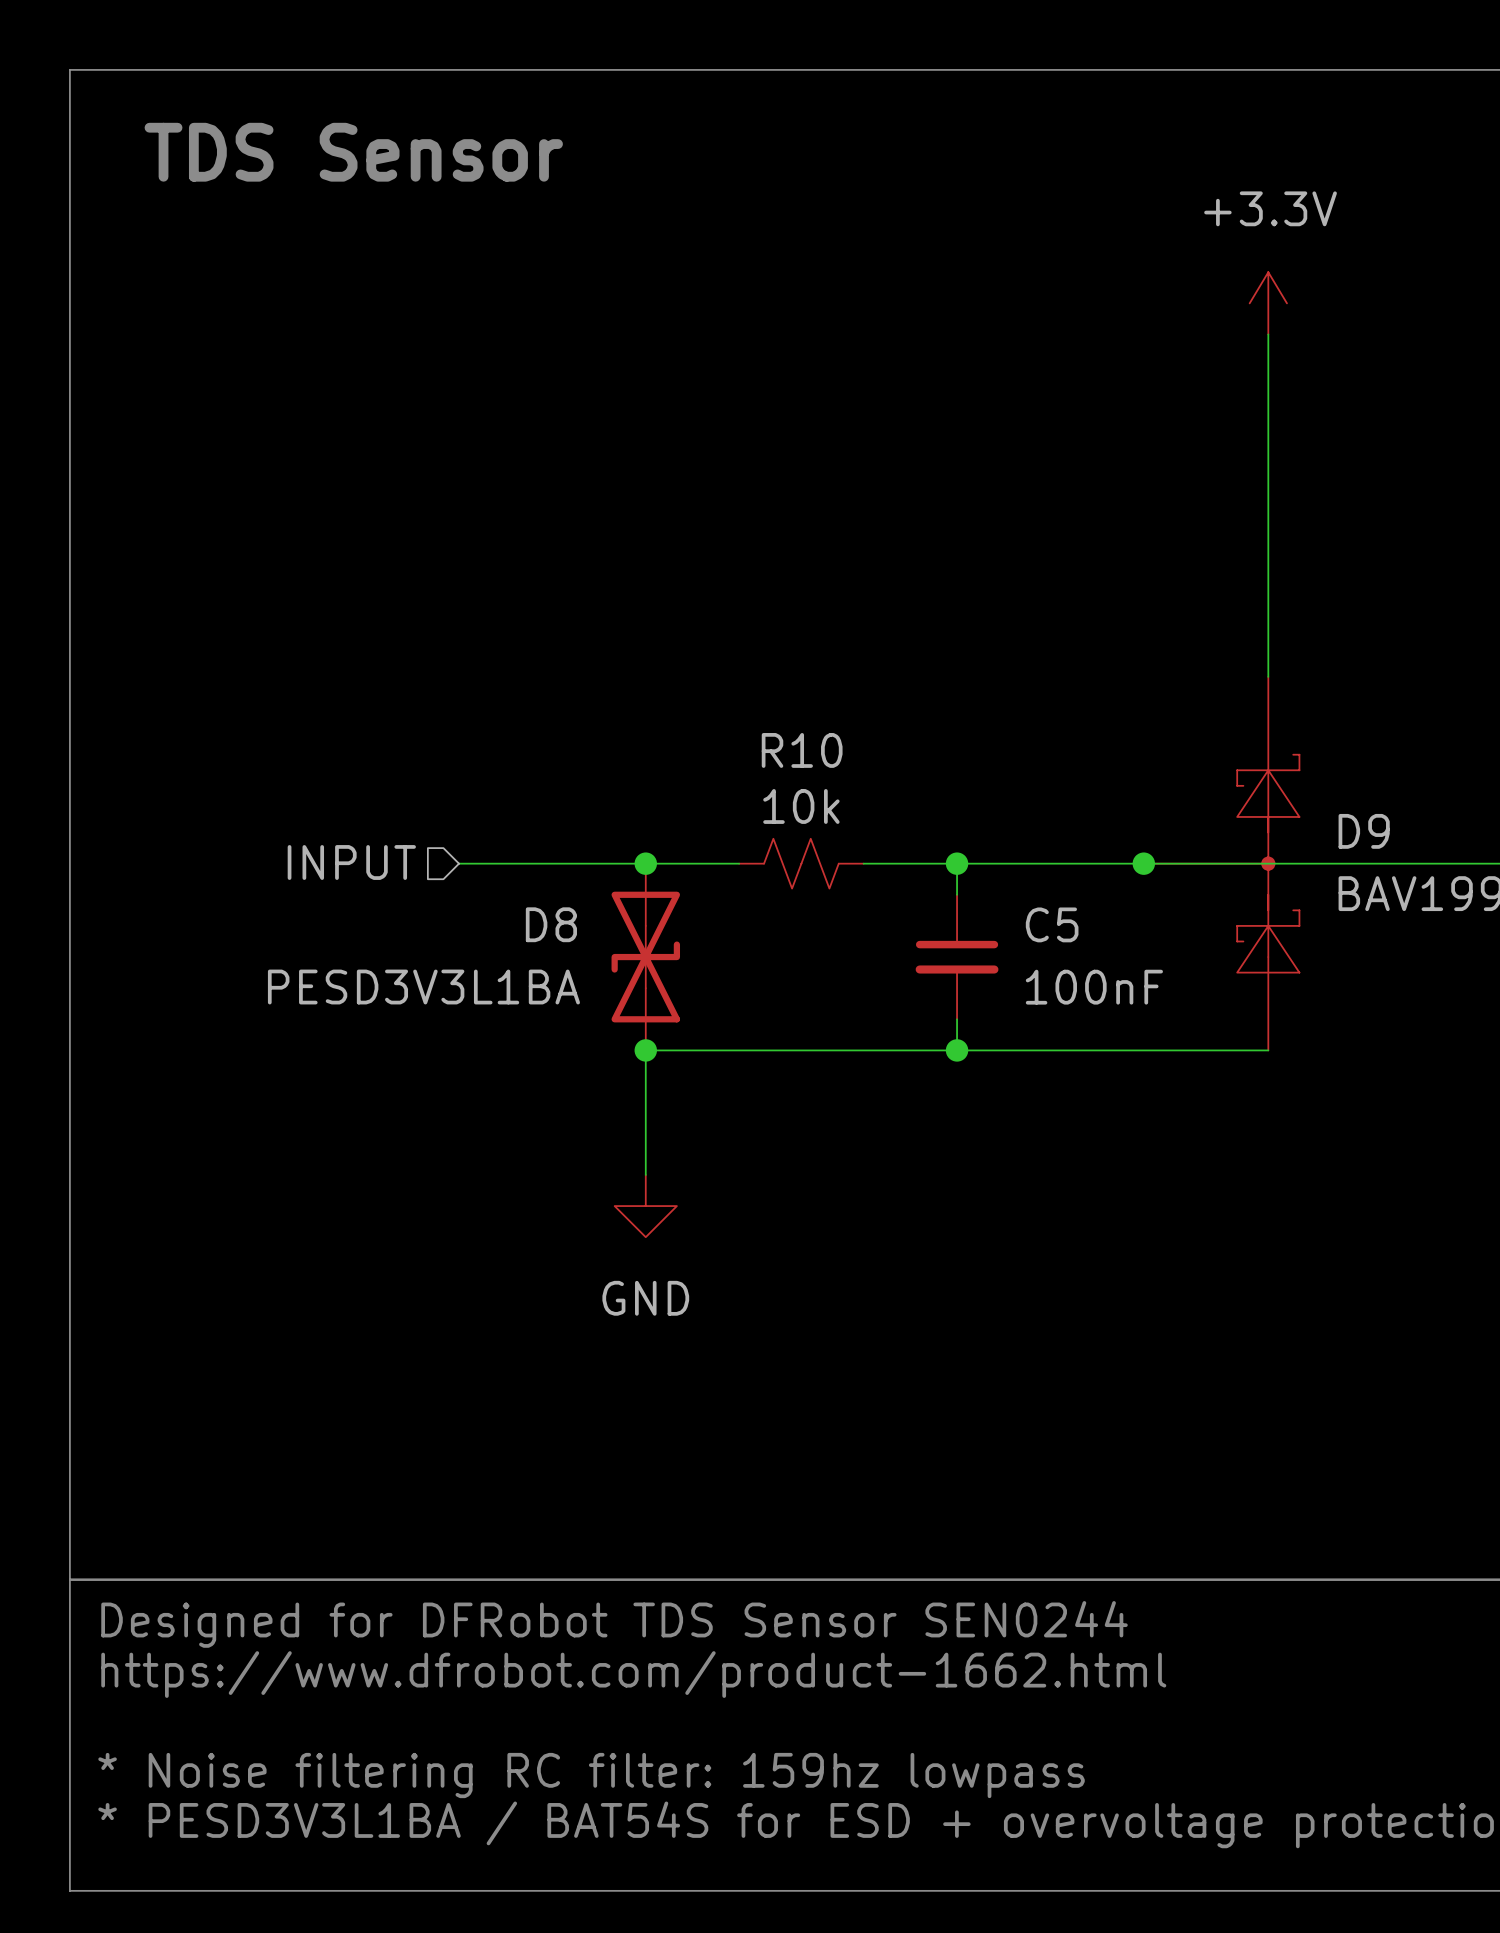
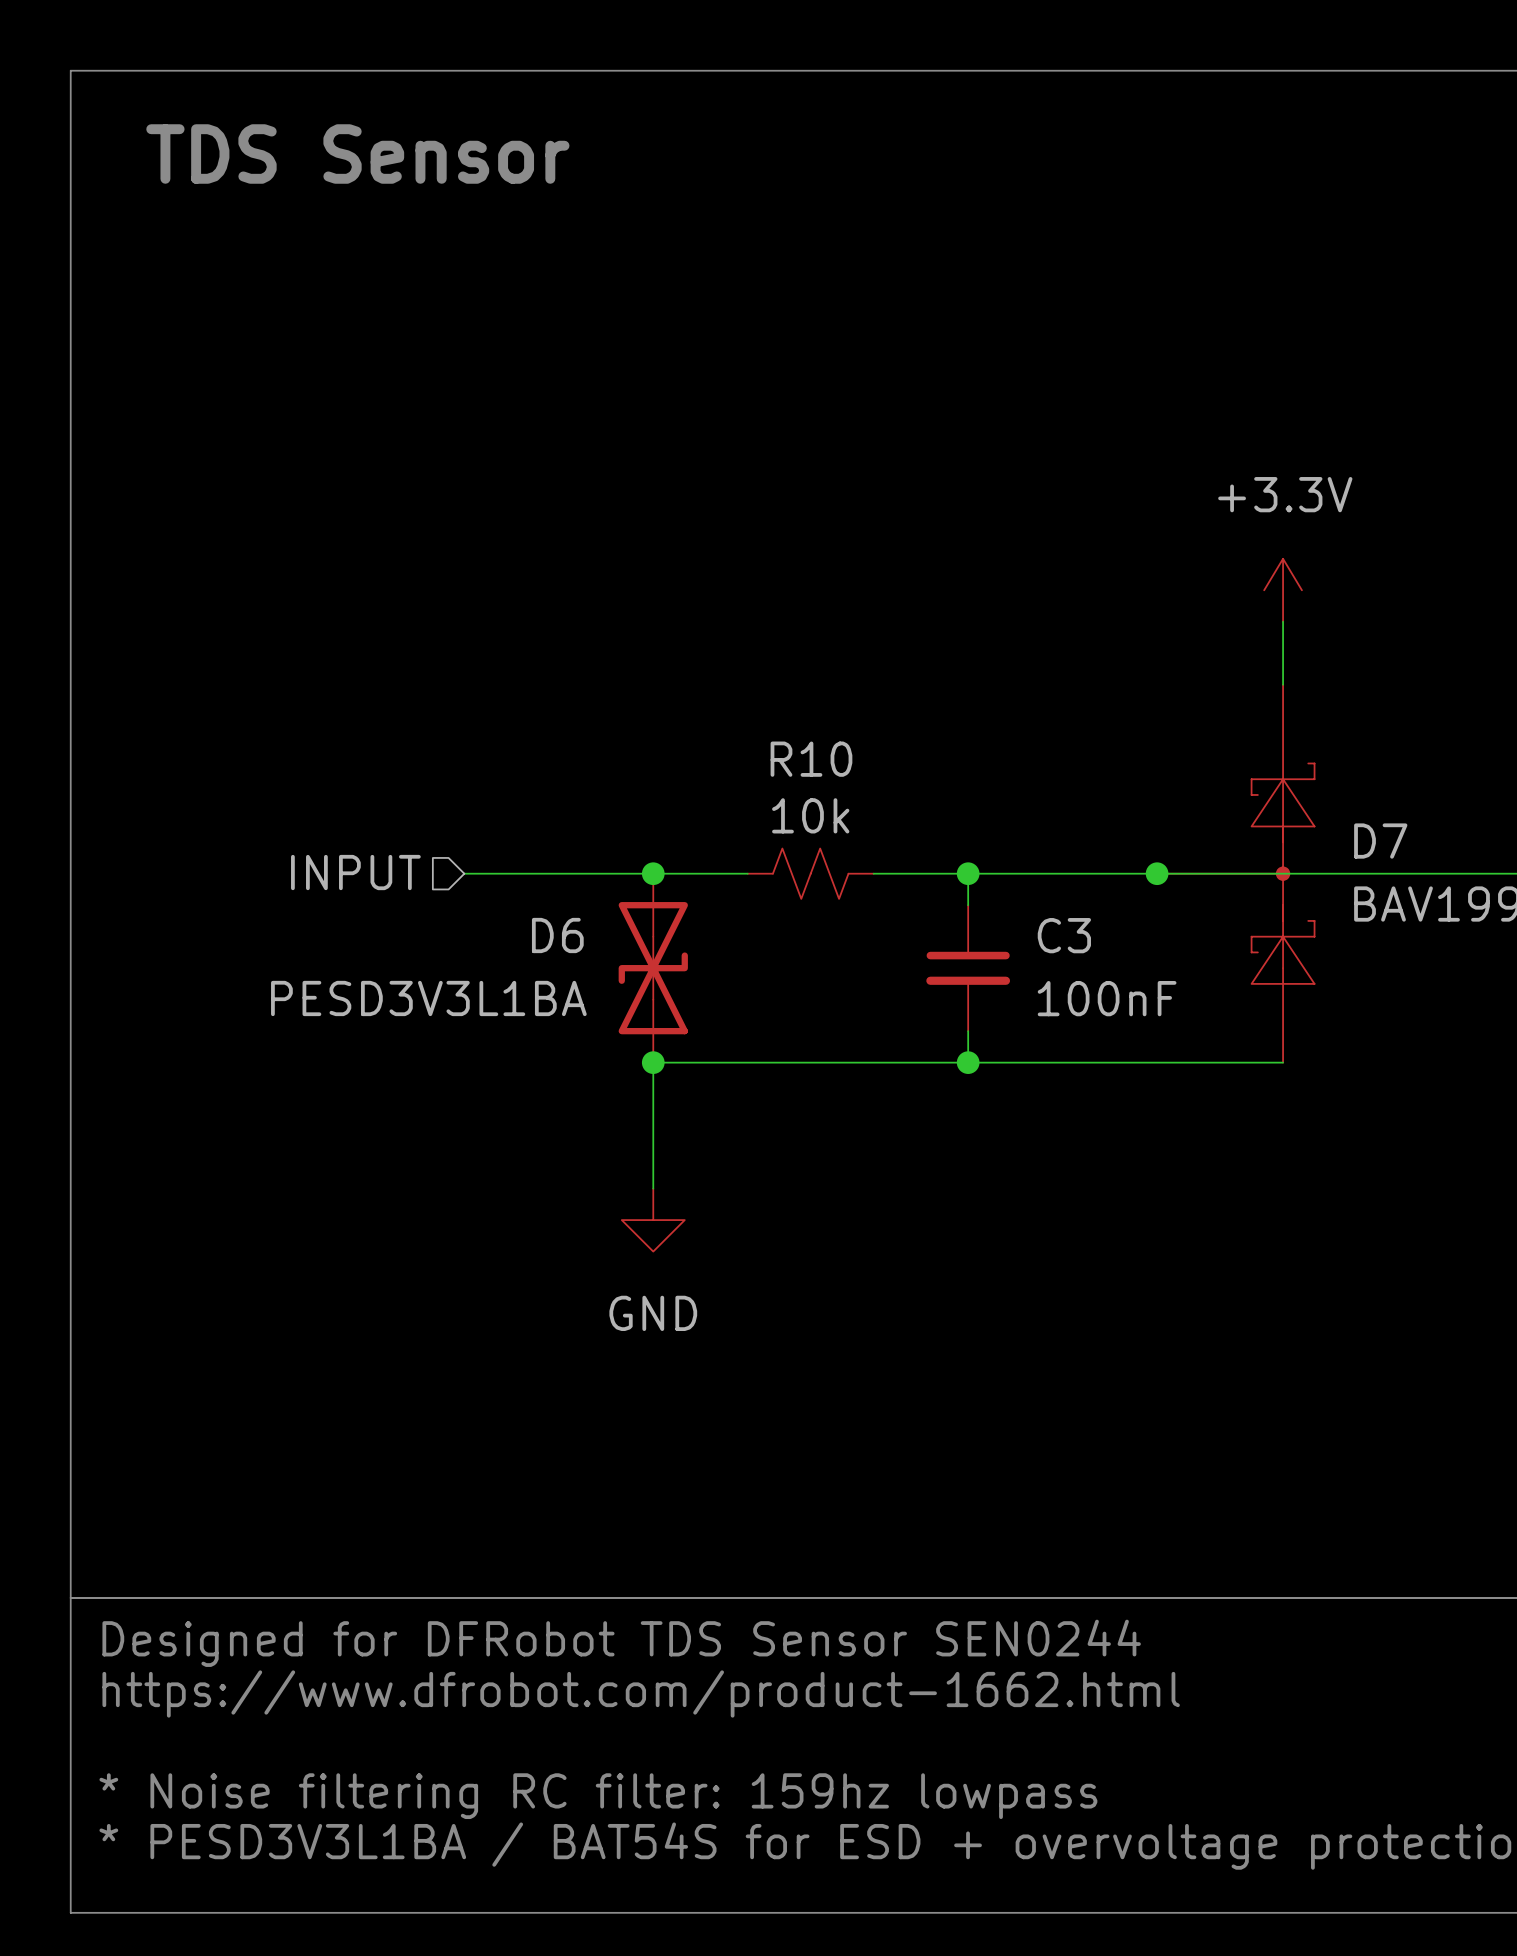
power symbol position: +3.3V (1268, 303) -> +3.3V (1283, 590)
wire: (1268, 334) (1268, 614) -> none
D9 name: D9 (1364, 831) -> D7 (1380, 841)
D8 name: D8 (551, 924) -> D6 (557, 935)
C5 name: C5 (1052, 924) -> C3 (1064, 935)

